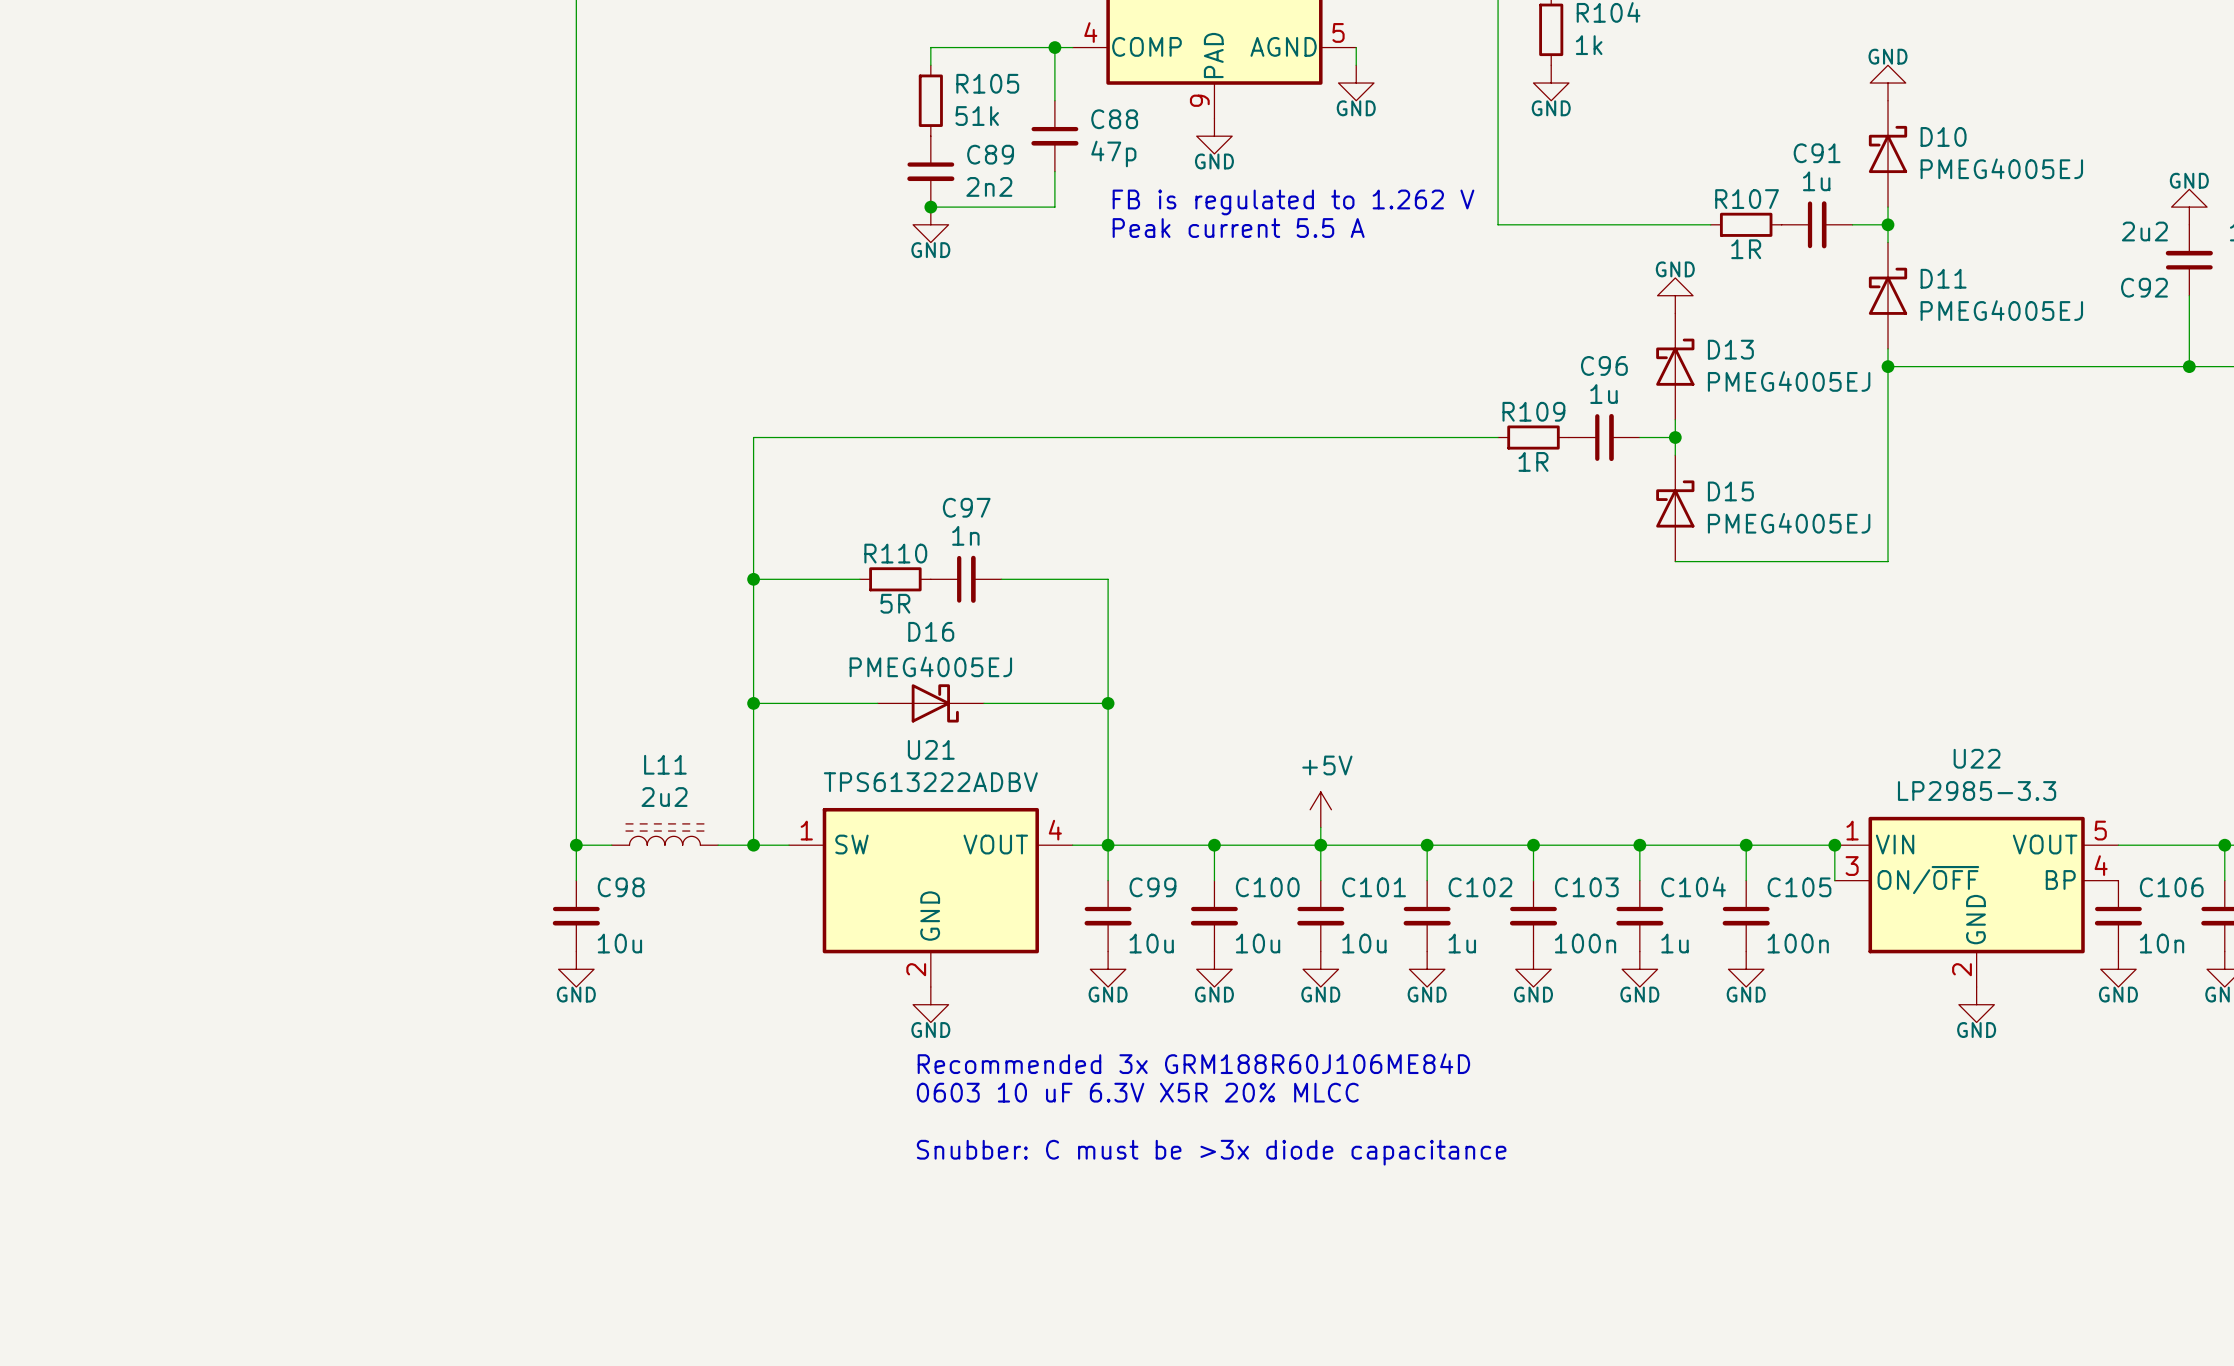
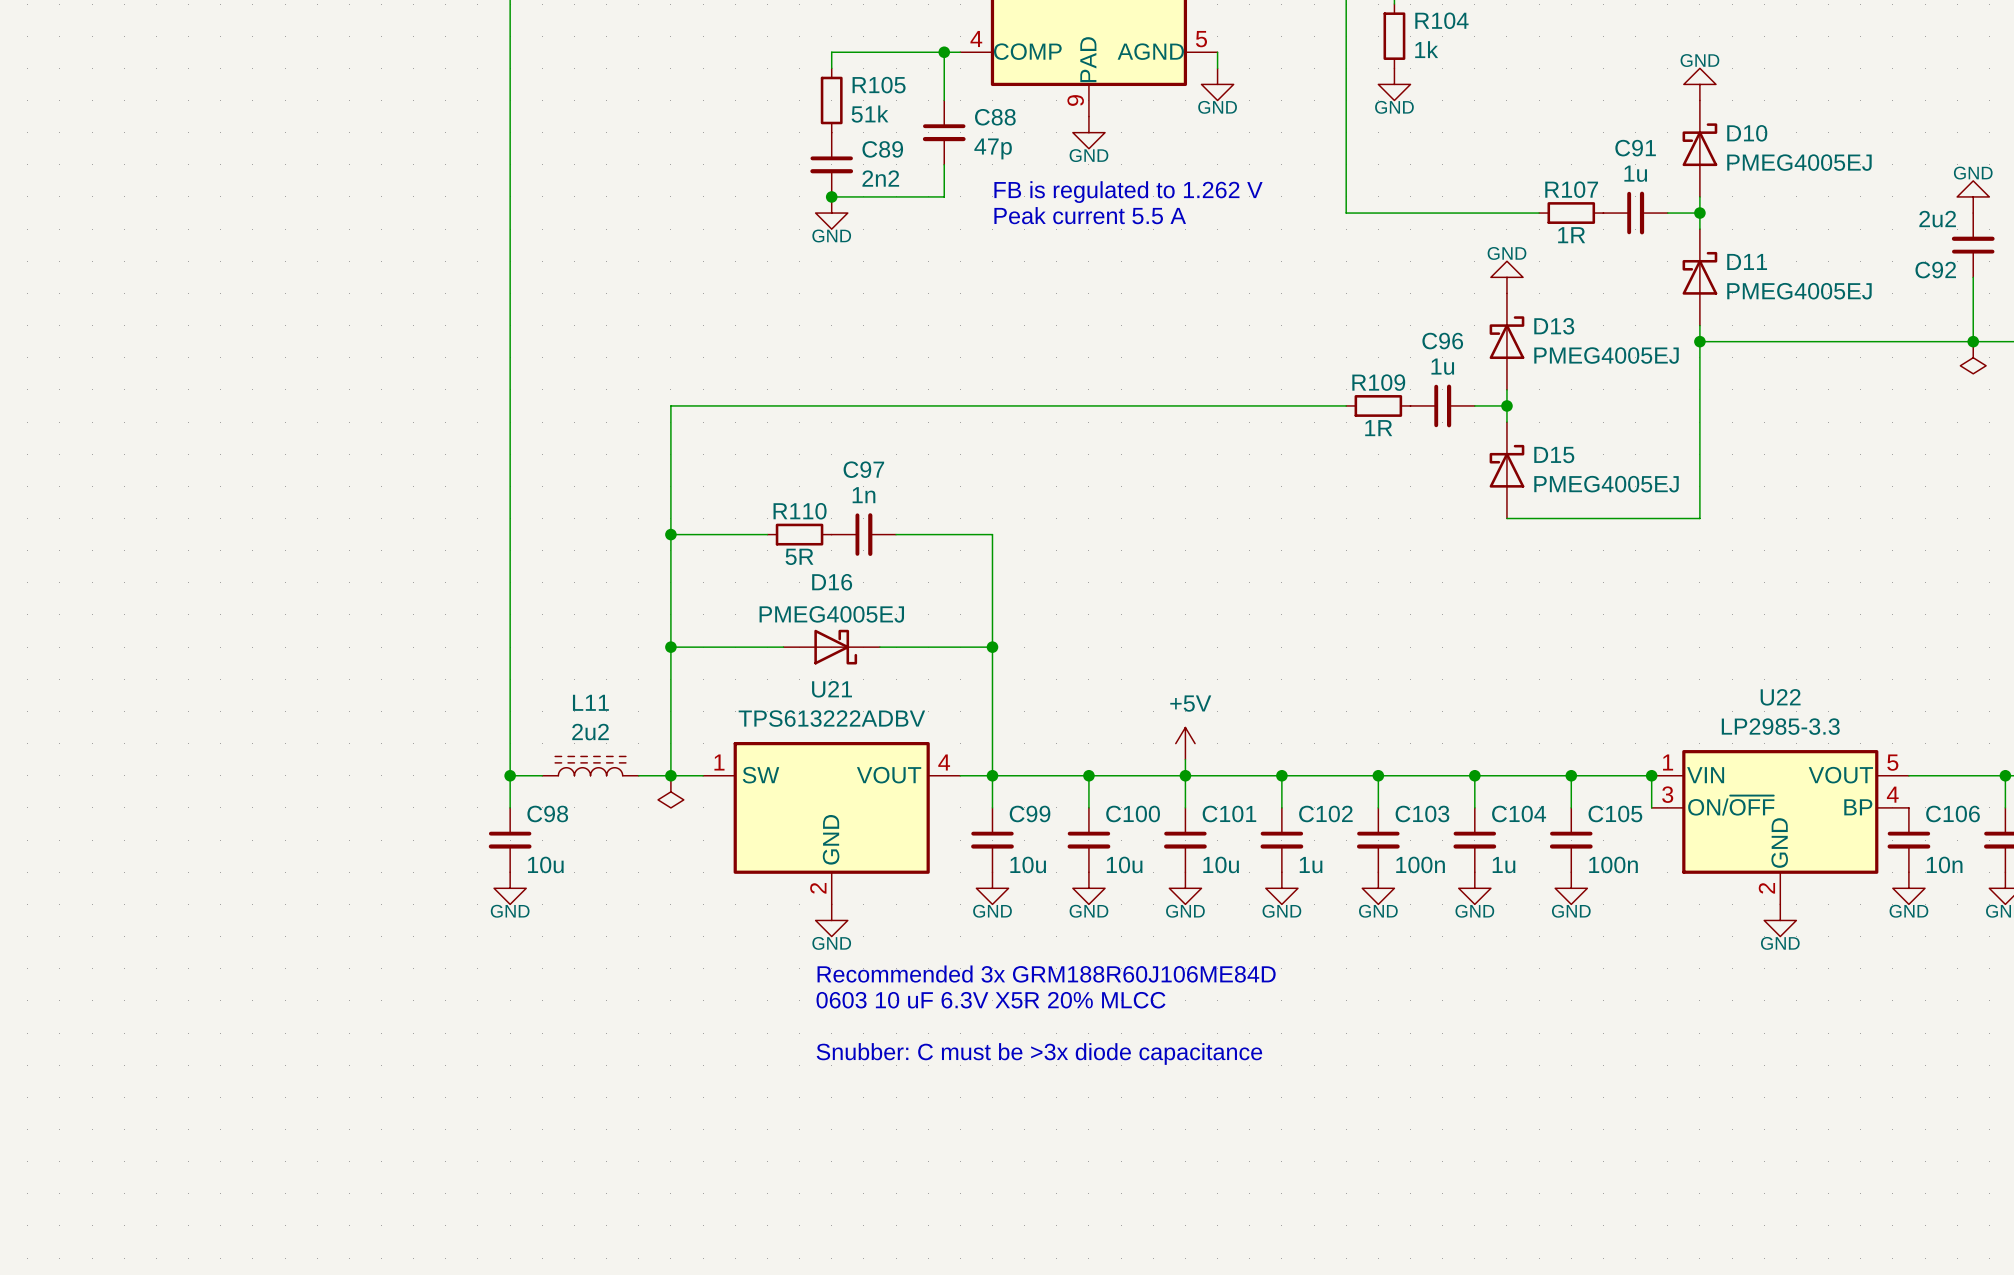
power symbol: none -> (1973, 357)
power symbol: none -> (670, 791)

